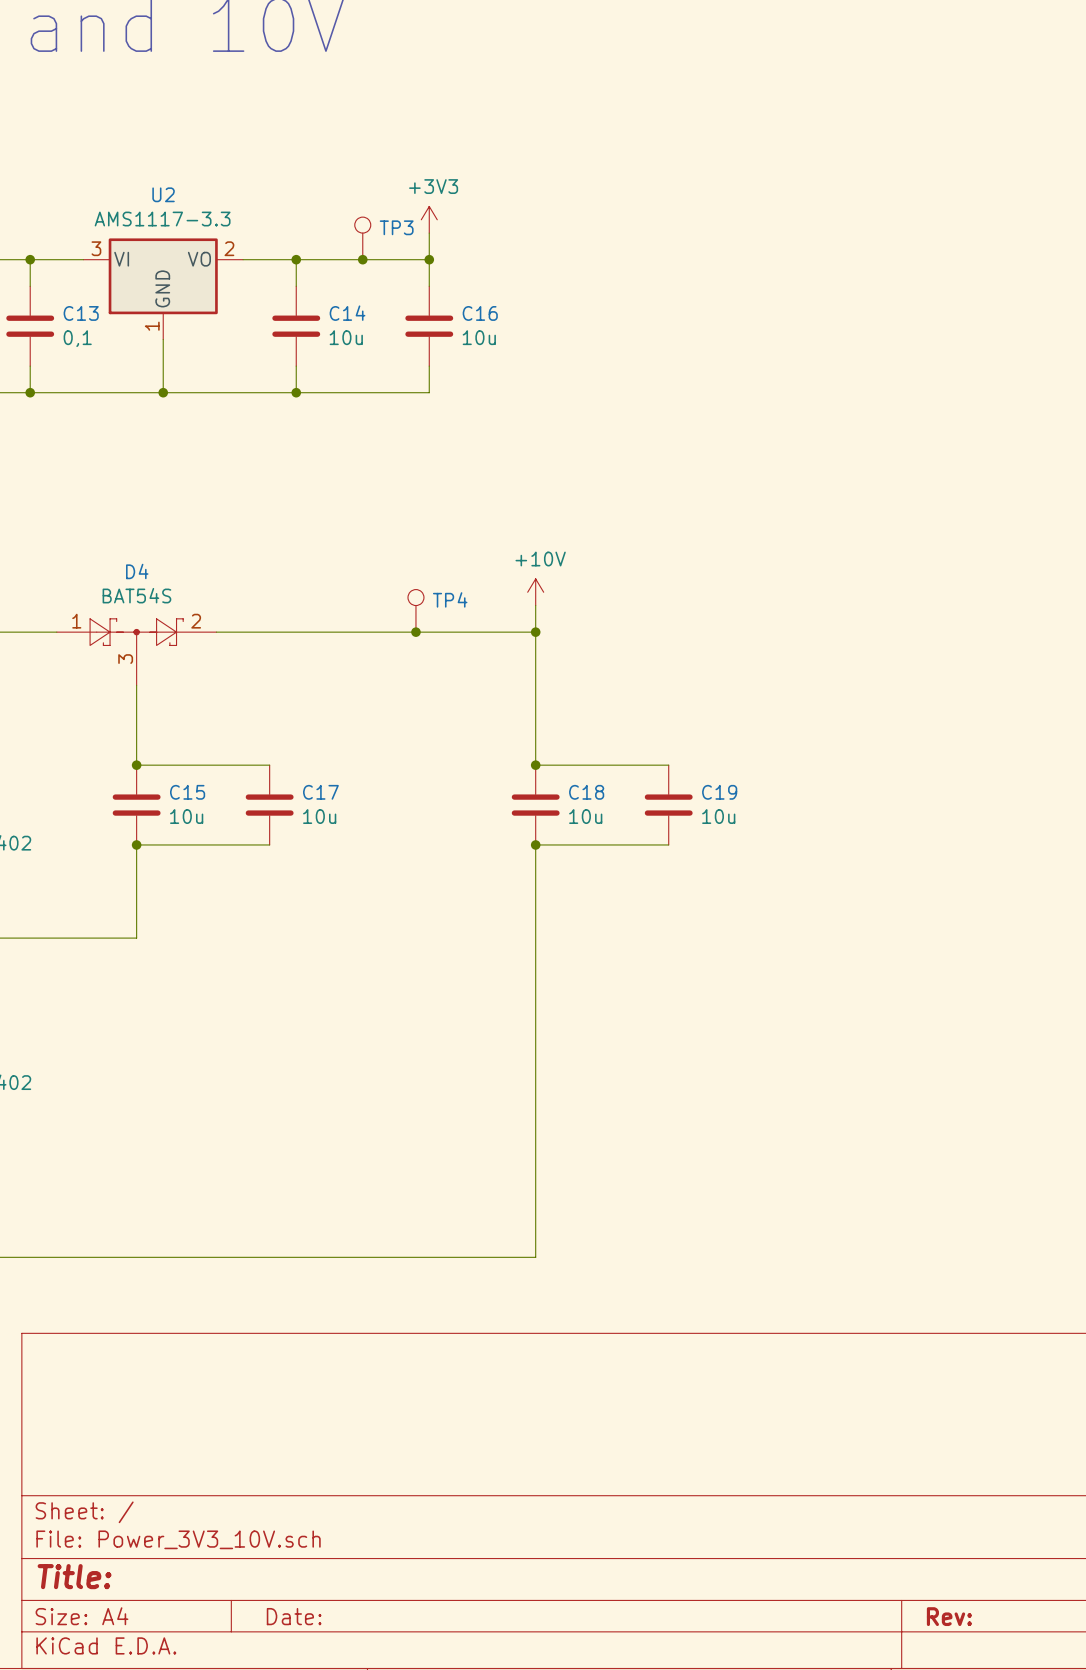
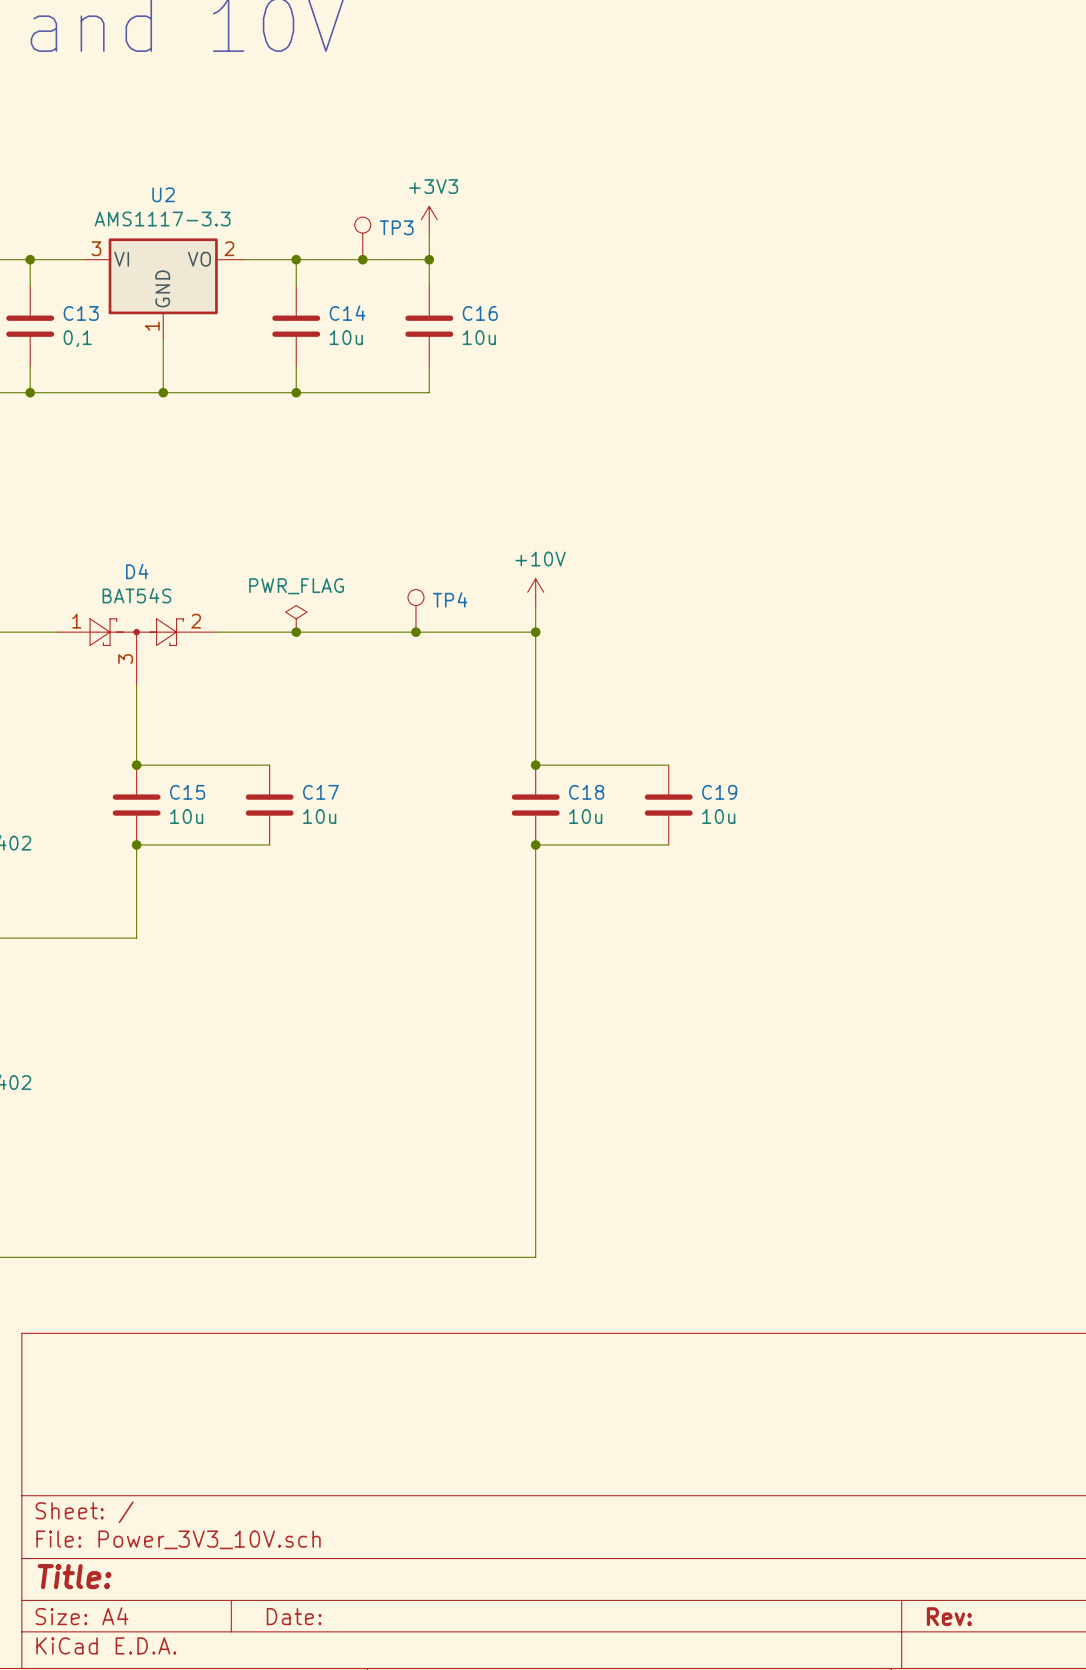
power symbol: none -> PWR_FLAG (296, 618)
junction: none -> (296, 632)

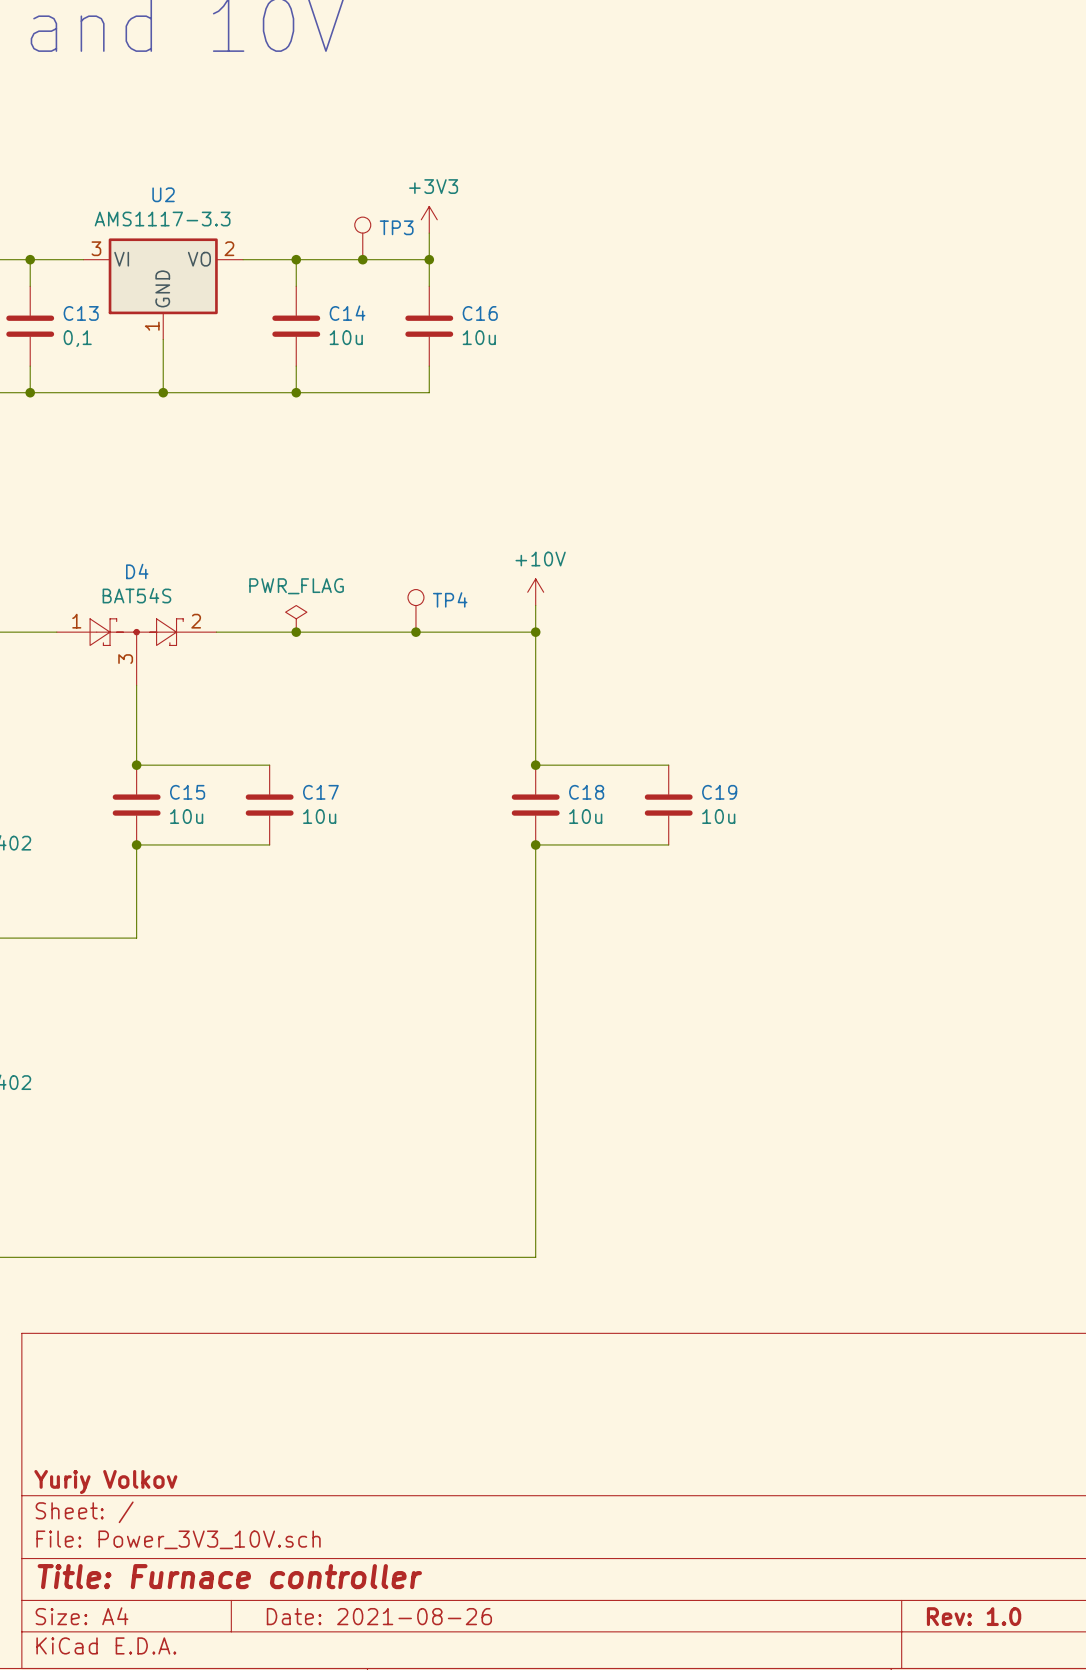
title block: none -> Yuriy Volkov (105, 1482)
title block: Title: (74, 1576) -> Title: Furnace controller (229, 1576)
title block: Date: (294, 1616) -> Date: 2021-08-26 (379, 1616)
title block: Rev: (949, 1616) -> Rev: 1.0 (974, 1616)

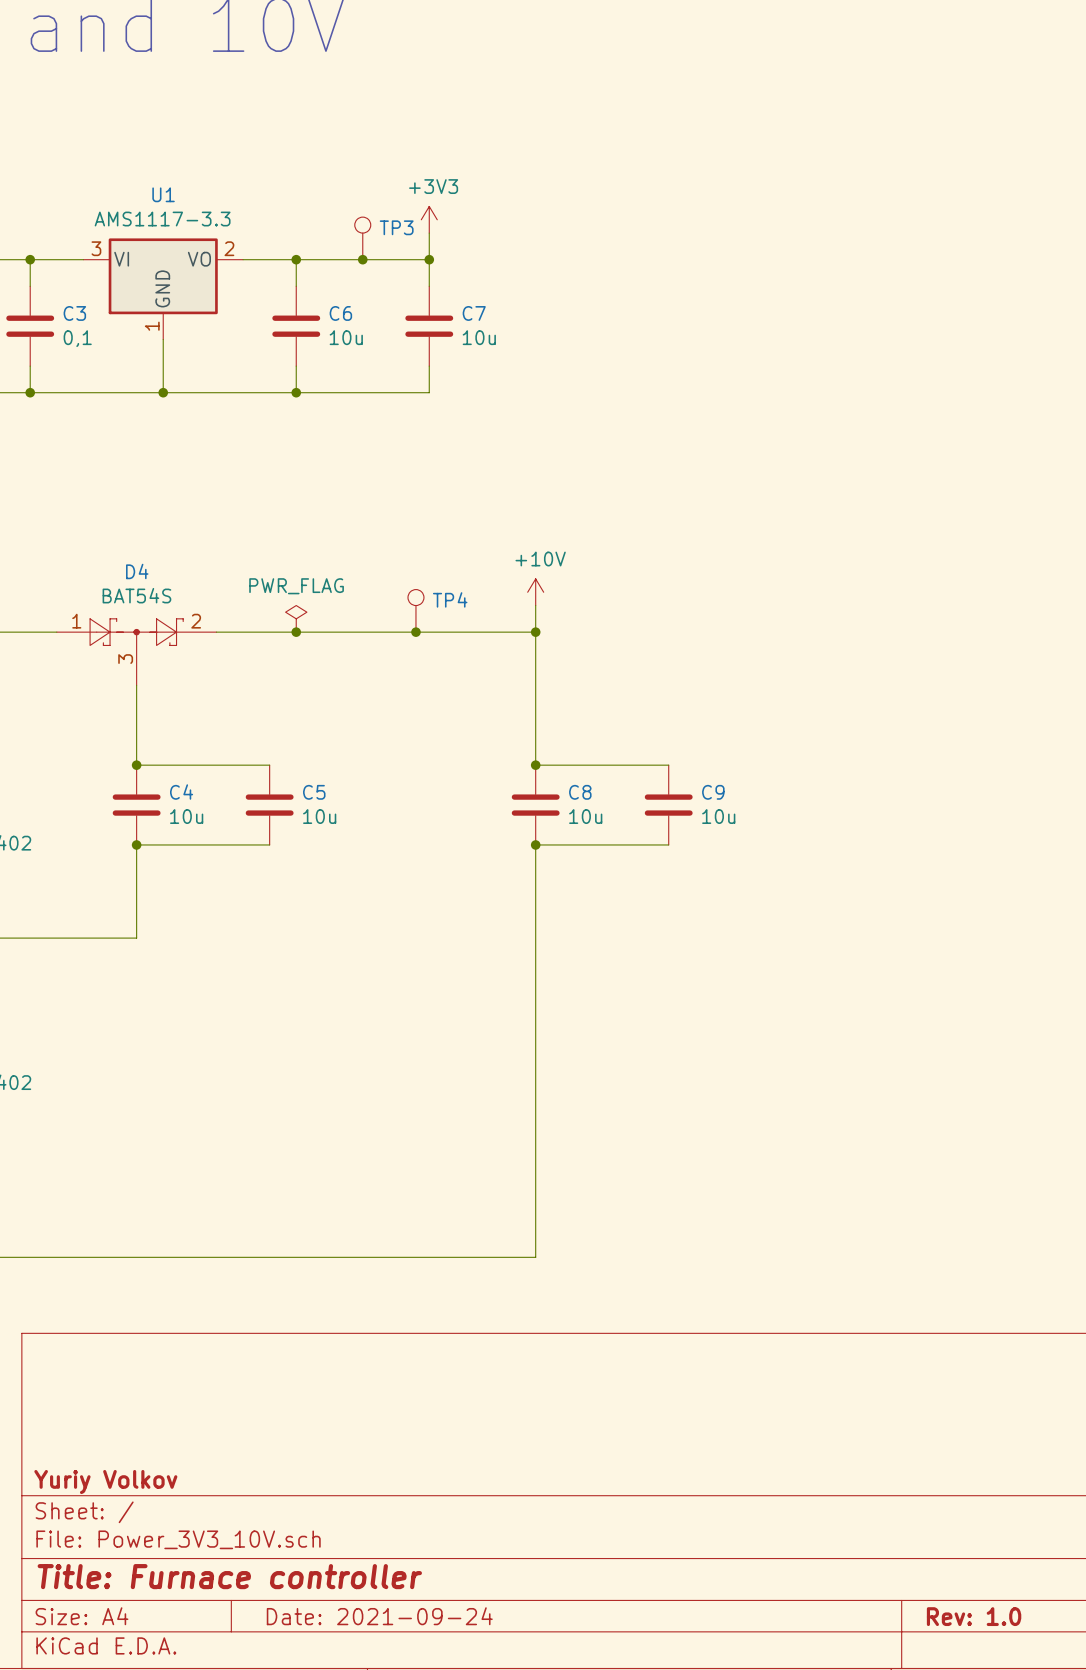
U2 name: U2 (163, 194) -> U1 (163, 194)
C13 name: C13 (81, 313) -> C3 (74, 313)
C14 name: C14 (347, 313) -> C6 (340, 313)
C16 name: C16 (480, 313) -> C7 (474, 313)
C15 name: C15 (187, 792) -> C4 (181, 792)
C17 name: C17 (320, 792) -> C5 (314, 792)
C18 name: C18 (586, 792) -> C8 (580, 792)
C19 name: C19 (719, 792) -> C9 (713, 792)
title block: Date: 2021-08-26 (379, 1616) -> Date: 2021-09-24 (379, 1616)

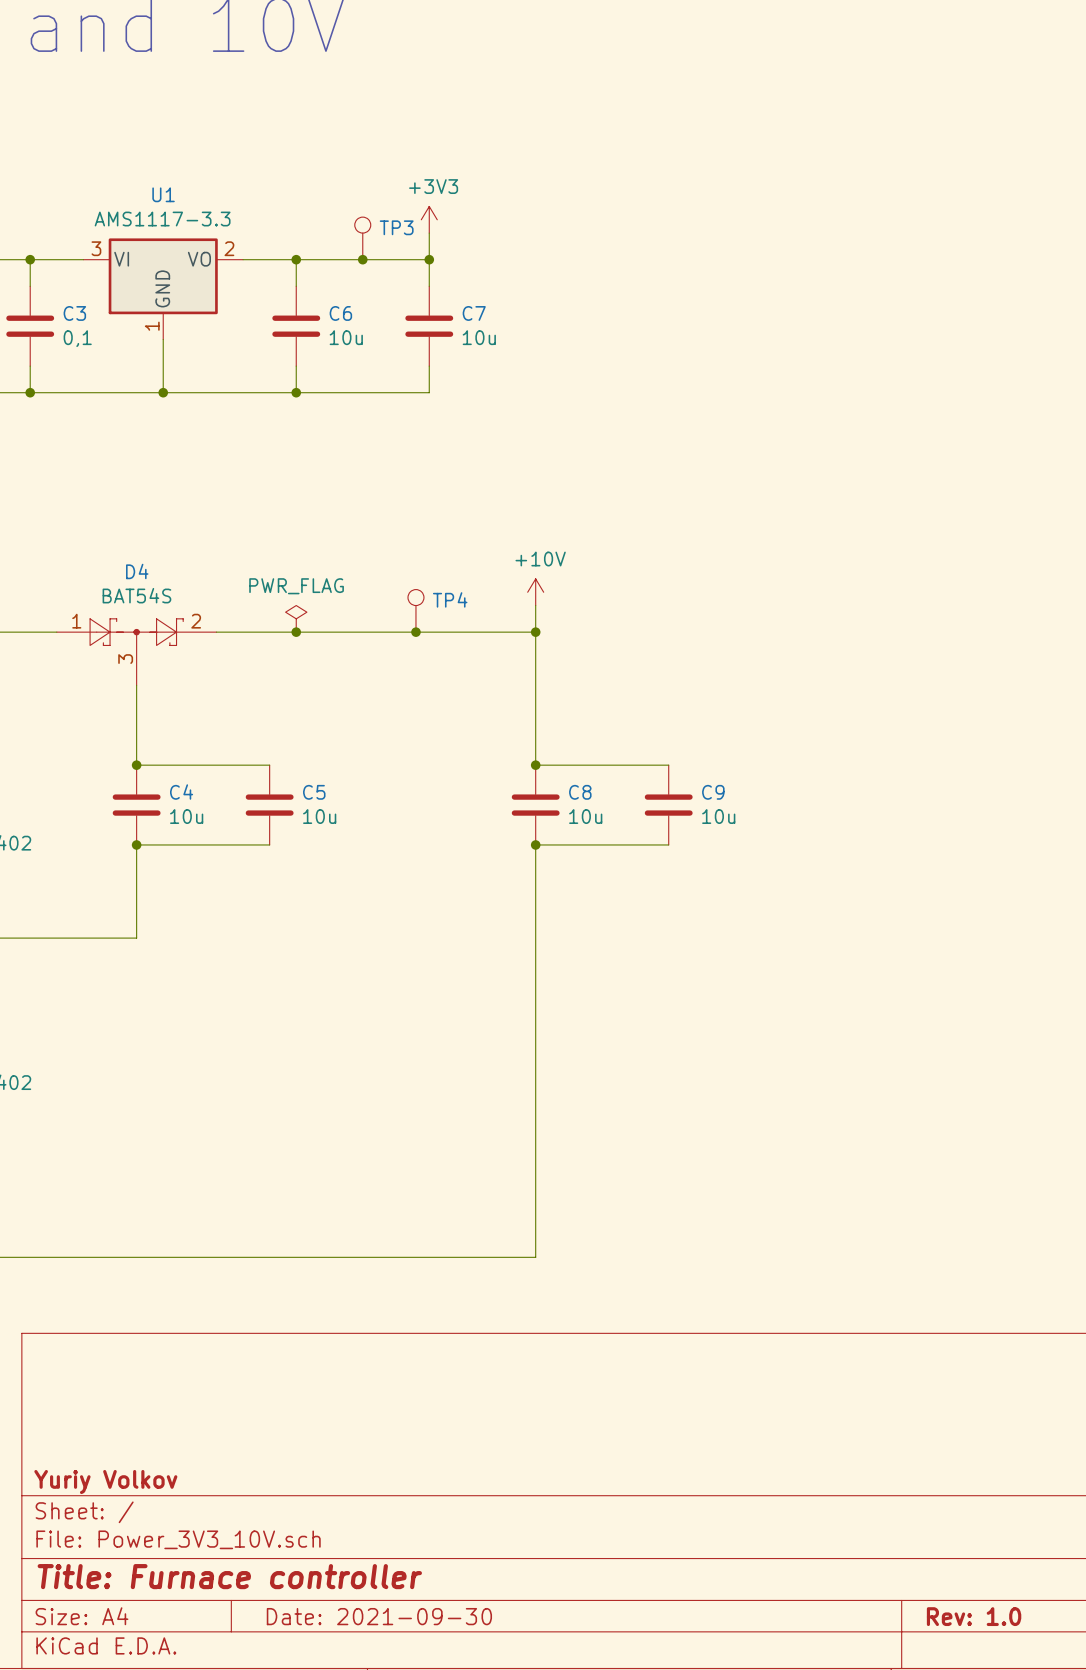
title block: Date: 2021-09-24 (379, 1616) -> Date: 2021-09-30 (379, 1616)

